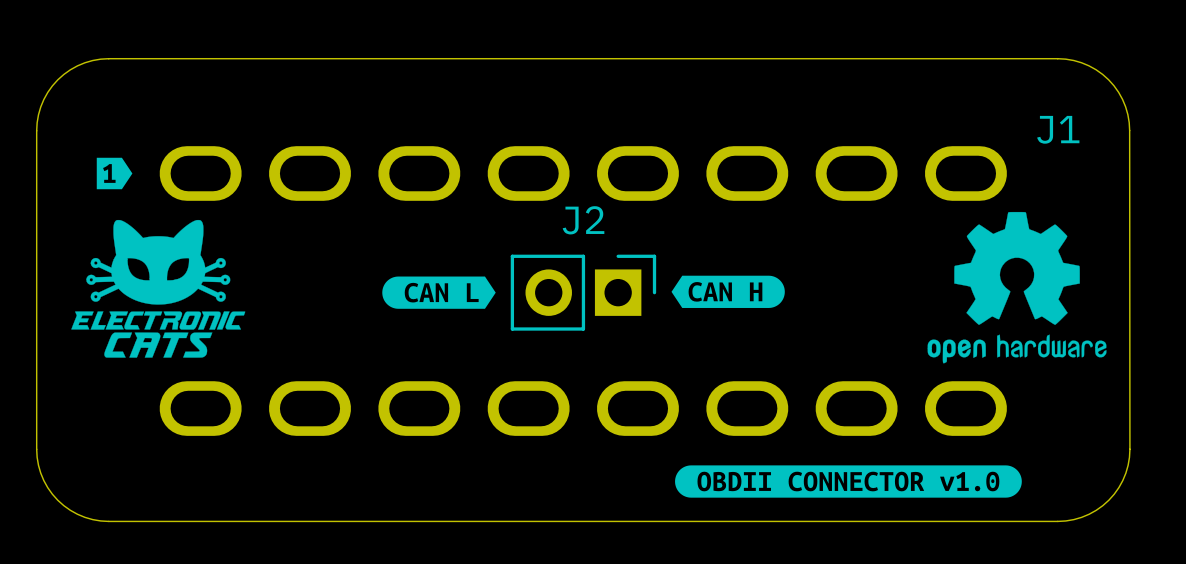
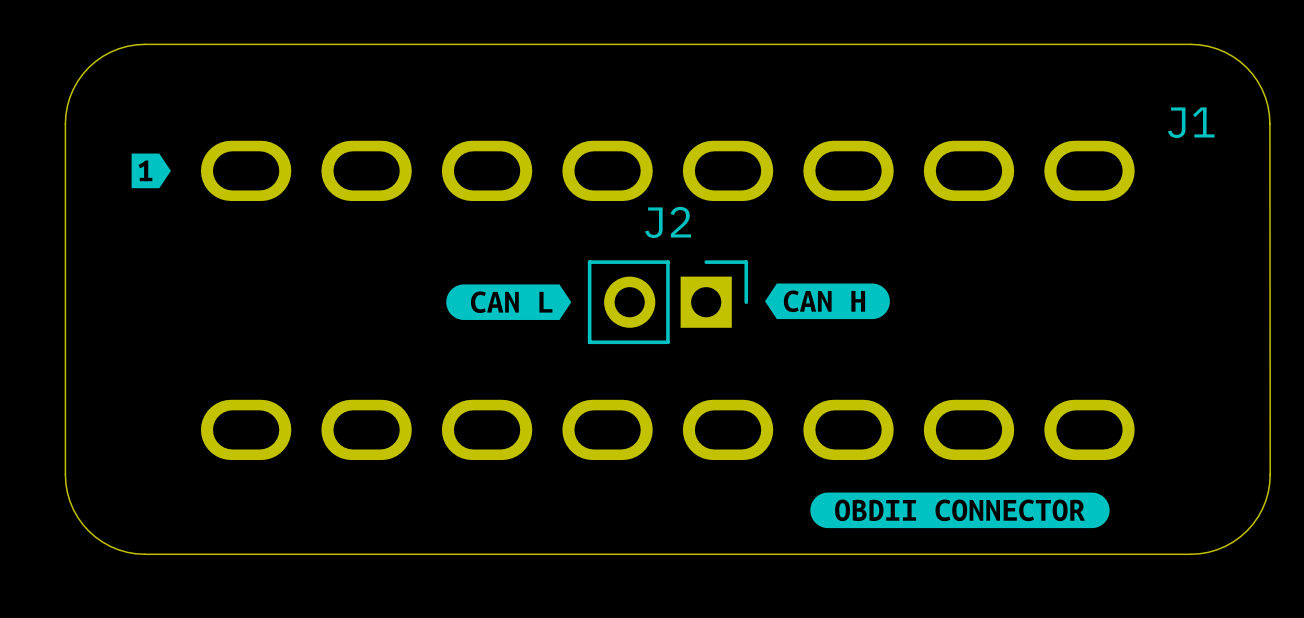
drawing: [927, 211, 1107, 364] -> none
drawing: [71, 219, 246, 358] -> none
drawing shape: [675, 465, 1022, 498] -> [810, 492, 1110, 529]

